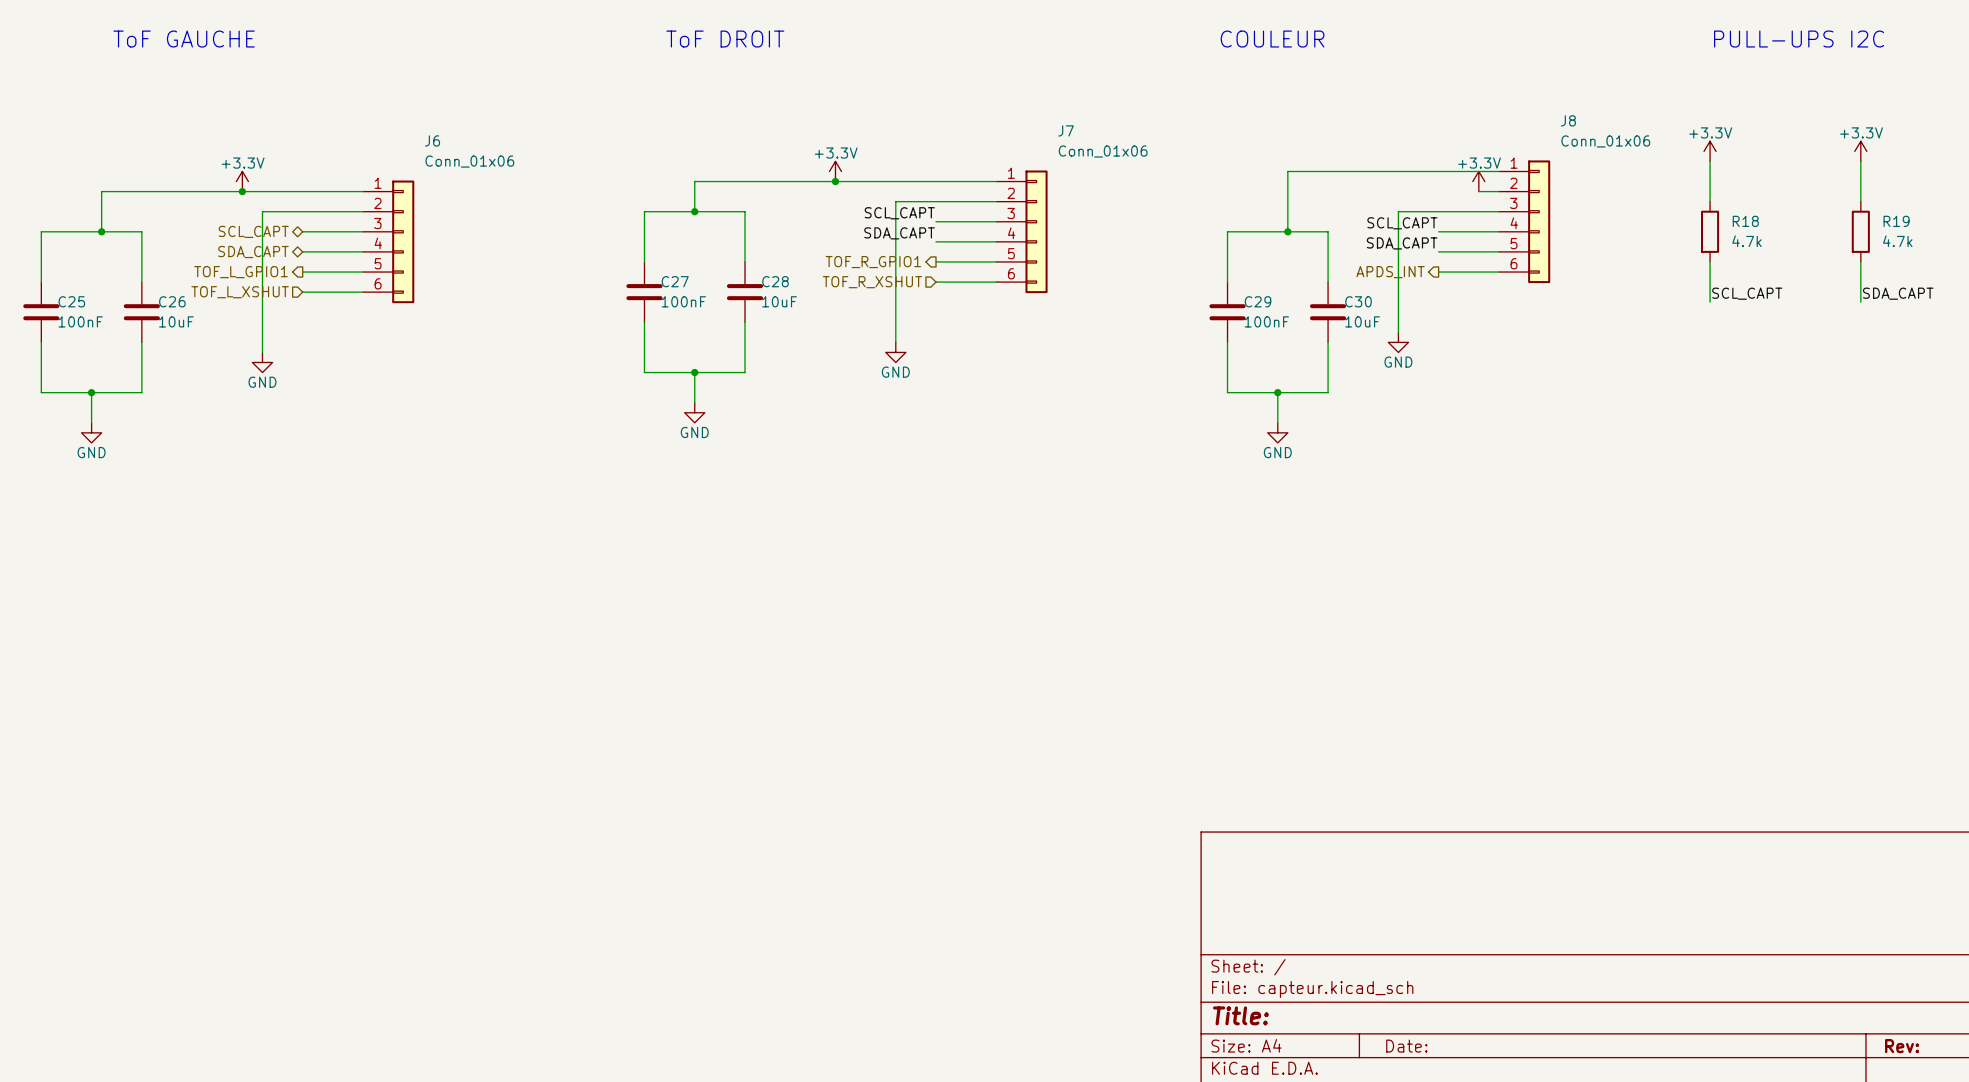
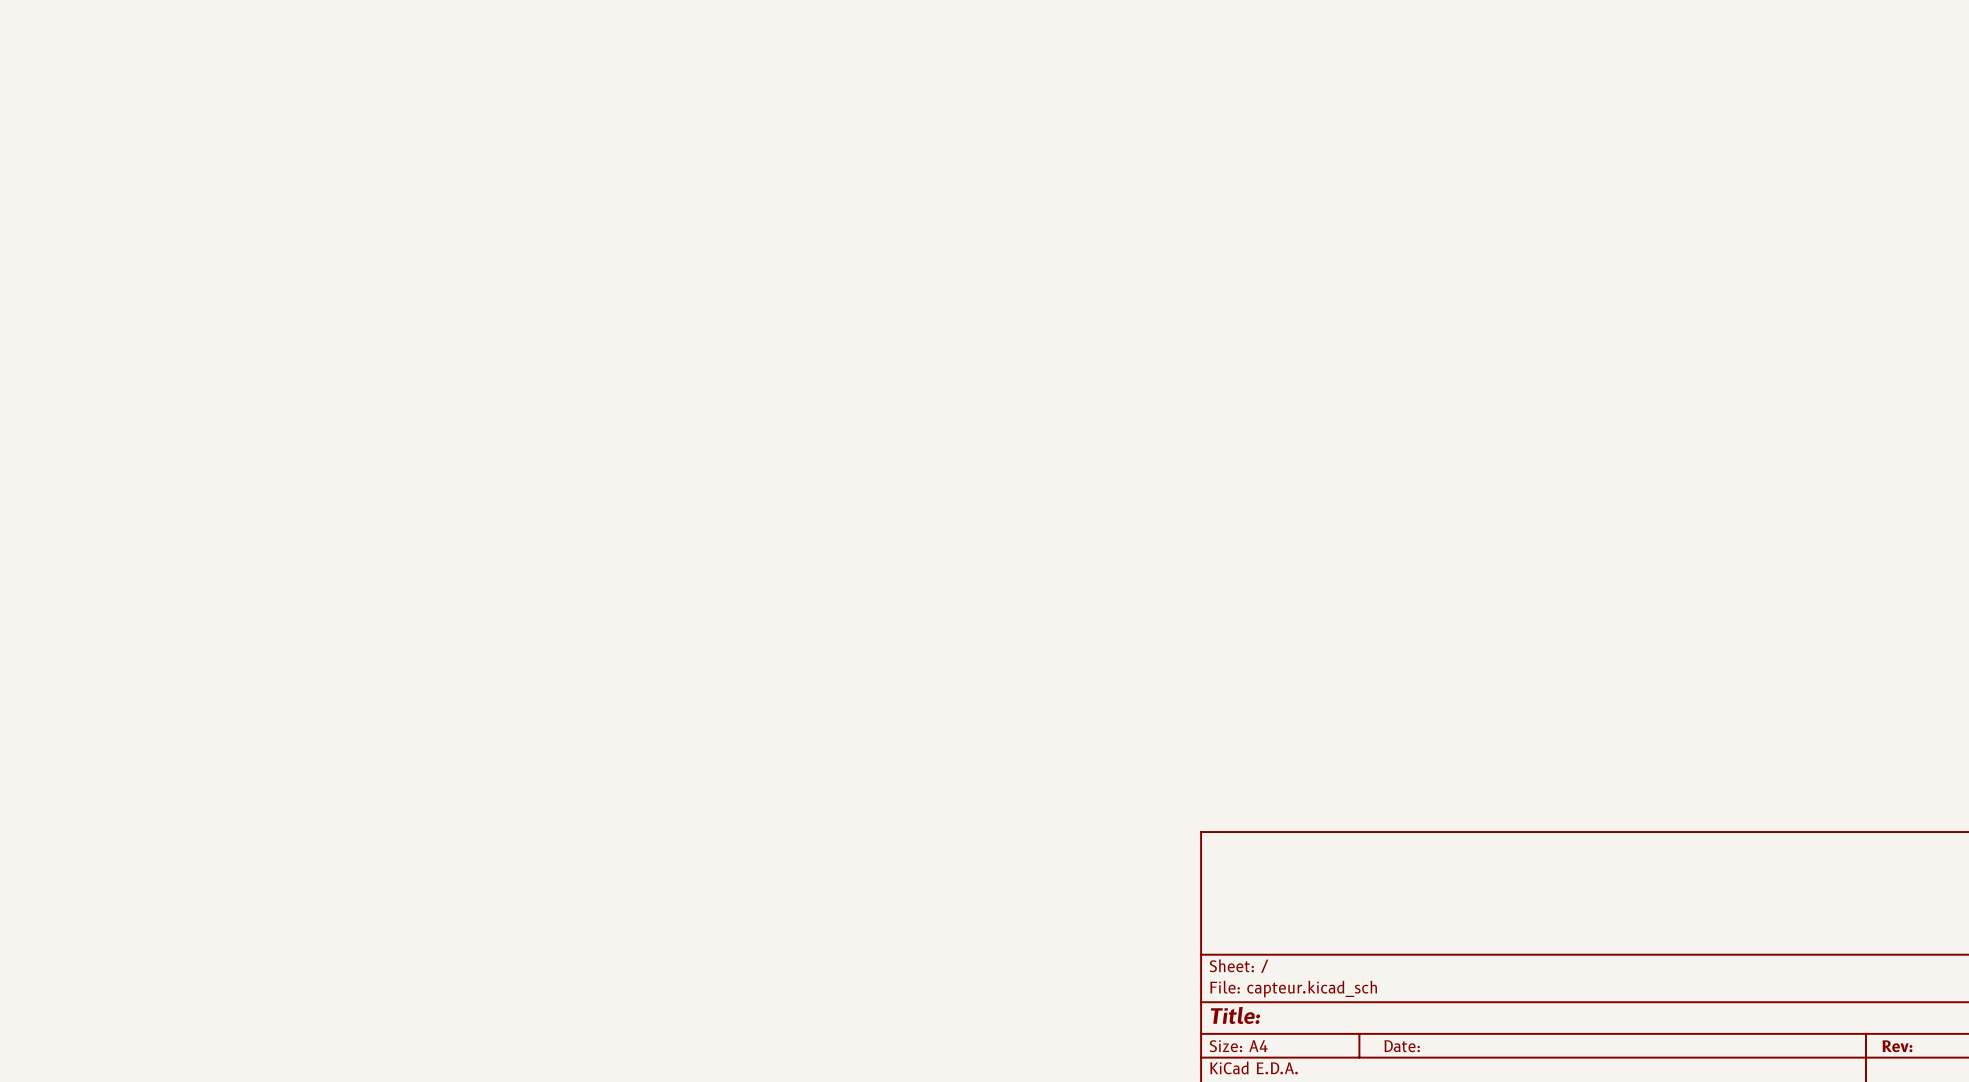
text: ToF GAUCHE (184, 39) -> none
text: ToF DROIT (725, 39) -> none
text: COULEUR (1272, 39) -> none
text: PULL-UPS I2C (1799, 39) -> none
power symbol: +3.3V (1710, 151) -> none
power symbol: +3.3V (1860, 151) -> none
wire: (1710, 161) (1710, 201) -> none
wire: (1860, 161) (1860, 201) -> none
power symbol: +3.3V (835, 171) -> none
wire: (1498, 171) (1287, 171) (1287, 231) -> none
power symbol: +3.3V (242, 181) -> none
junction: (835, 181) -> none
wire: (996, 181) (694, 181) (694, 211) -> none
power symbol: +3.3V (1478, 181) -> none
junction: (242, 191) -> none
wire: (363, 191) (101, 191) (101, 231) -> none
wire: (1478, 191) (1498, 191) -> none
wire: (996, 201) (895, 201) (895, 342) -> none
wire: (363, 211) (262, 211) (262, 352) -> none
junction: (694, 211) -> none
wire: (1498, 211) (1398, 211) (1398, 332) -> none
label: SCL_CAPT (899, 213) -> none
wire: (936, 221) (996, 221) -> none
J8: Conn_01x06 (1524, 221) -> none
label: SCL_CAPT (1402, 223) -> none
junction: (101, 231) -> none
hierarchical label: SCL_CAPT (253, 231) -> none
wire: (302, 231) (363, 231) -> none
J7: Conn_01x06 (1021, 231) -> none
junction: (1287, 231) -> none
wire: (1438, 231) (1498, 231) -> none
R18: 4.7k (1710, 231) -> none
R19: 4.7k (1860, 231) -> none
label: SDA_CAPT (899, 233) -> none
J6: Conn_01x06 (388, 241) -> none
wire: (936, 241) (996, 241) -> none
label: SDA_CAPT (1402, 243) -> none
wire: (302, 251) (363, 251) -> none
wire: (1438, 251) (1498, 251) -> none
hierarchical label: SDA_CAPT (253, 252) -> none
wire: (644, 261) (644, 211) (745, 211) (745, 261) -> none
wire: (936, 261) (996, 261) -> none
wire: (1710, 261) (1710, 302) -> none
wire: (1860, 261) (1860, 302) -> none
hierarchical label: TOF_R_GPIO1 (873, 262) -> none
hierarchical label: TOF_L_GPIO1 (241, 272) -> none
wire: (302, 272) (363, 272) -> none
hierarchical label: APDS_INT (1390, 272) -> none
wire: (1438, 272) (1498, 272) -> none
wire: (41, 282) (41, 231) (141, 231) (141, 282) -> none
hierarchical label: TOF_R_XSHUT (872, 282) -> none
wire: (936, 282) (996, 282) -> none
wire: (1227, 282) (1227, 231) (1328, 231) (1328, 282) -> none
hierarchical label: TOF_L_XSHUT (240, 292) -> none
wire: (302, 292) (363, 292) -> none
C27: 100nF (644, 292) -> none
C28: 10uF (745, 292) -> none
label: SCL_CAPT (1747, 293) -> none
label: SDA_CAPT (1898, 293) -> none
C25: 100nF (41, 312) -> none
C26: 10uF (141, 312) -> none
C29: 100nF (1227, 312) -> none
C30: 10uF (1328, 312) -> none
wire: (644, 322) (644, 372) (745, 372) (745, 322) -> none
wire: (41, 342) (41, 392) (141, 392) (141, 342) -> none
wire: (1227, 342) (1227, 392) (1328, 392) (1328, 342) -> none
power symbol: GND (1398, 342) -> none
power symbol: GND (895, 352) -> none
power symbol: GND (262, 362) -> none
wire: (694, 372) (694, 402) -> none
junction: (694, 372) -> none
wire: (91, 392) (91, 422) -> none
junction: (91, 392) -> none
wire: (1277, 392) (1277, 422) -> none
junction: (1277, 392) -> none
power symbol: GND (694, 412) -> none
power symbol: GND (91, 432) -> none
power symbol: GND (1277, 432) -> none

